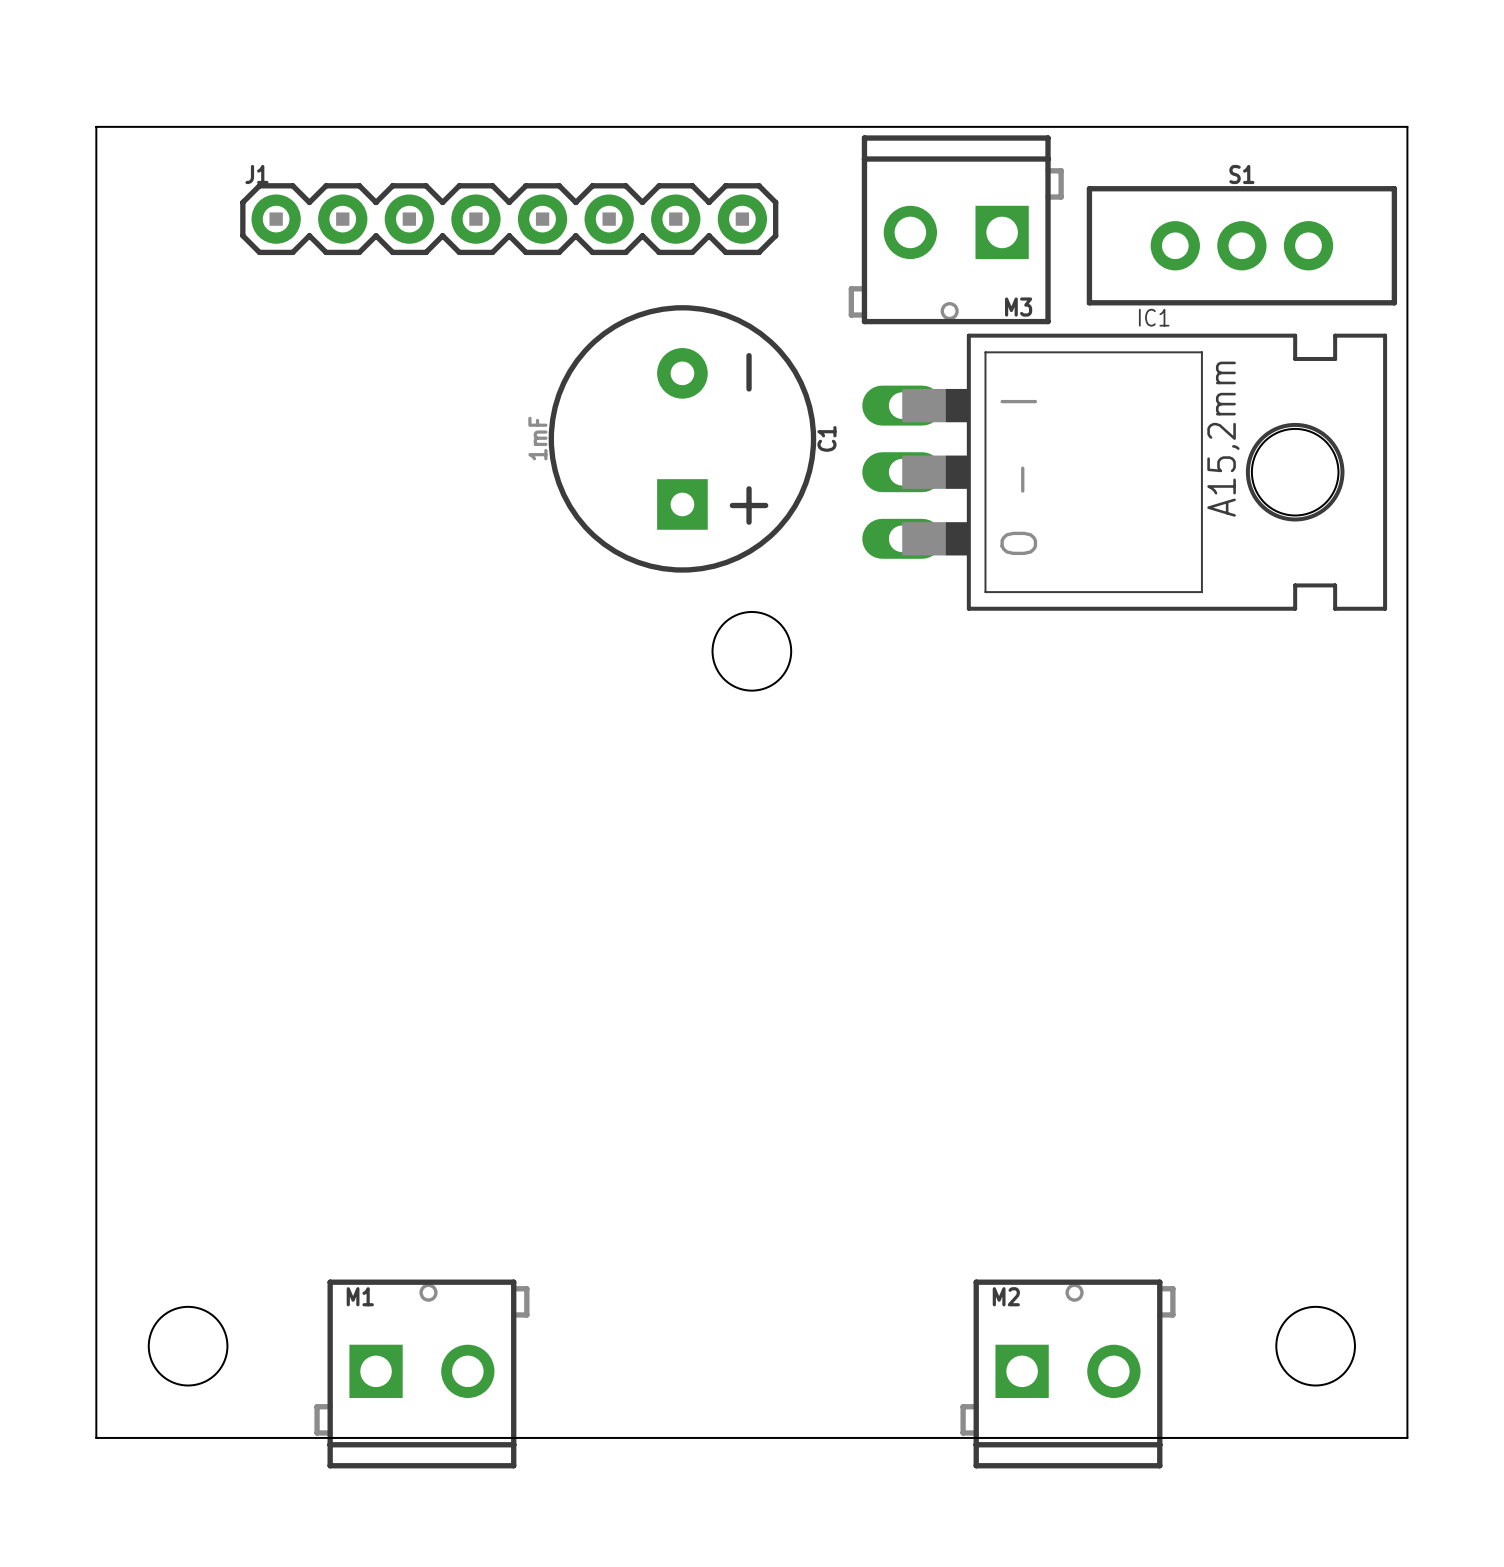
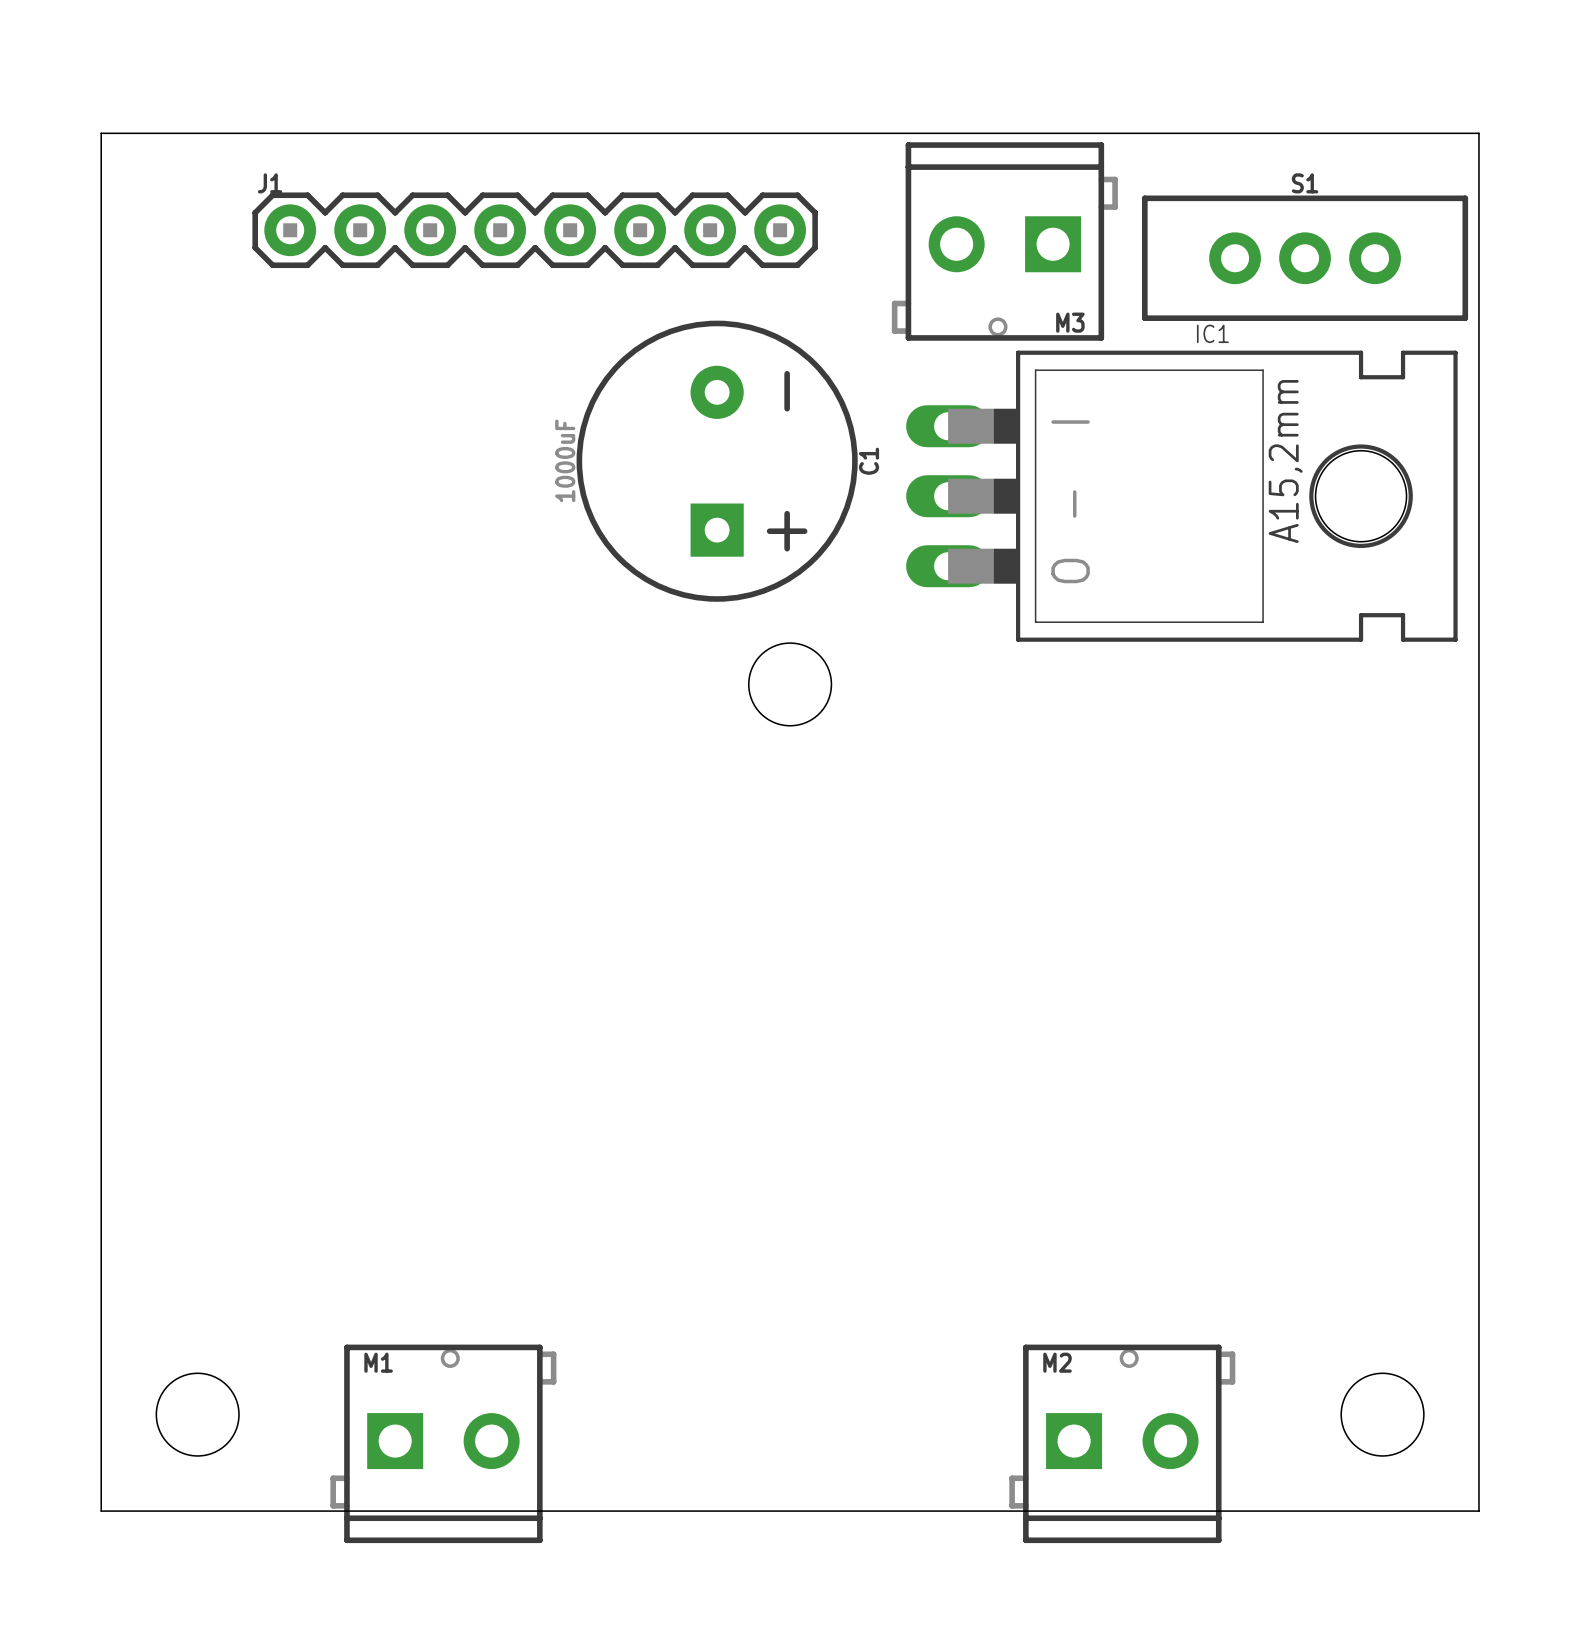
C1 value: 1mF (537, 438) -> 1000uF (565, 460)

